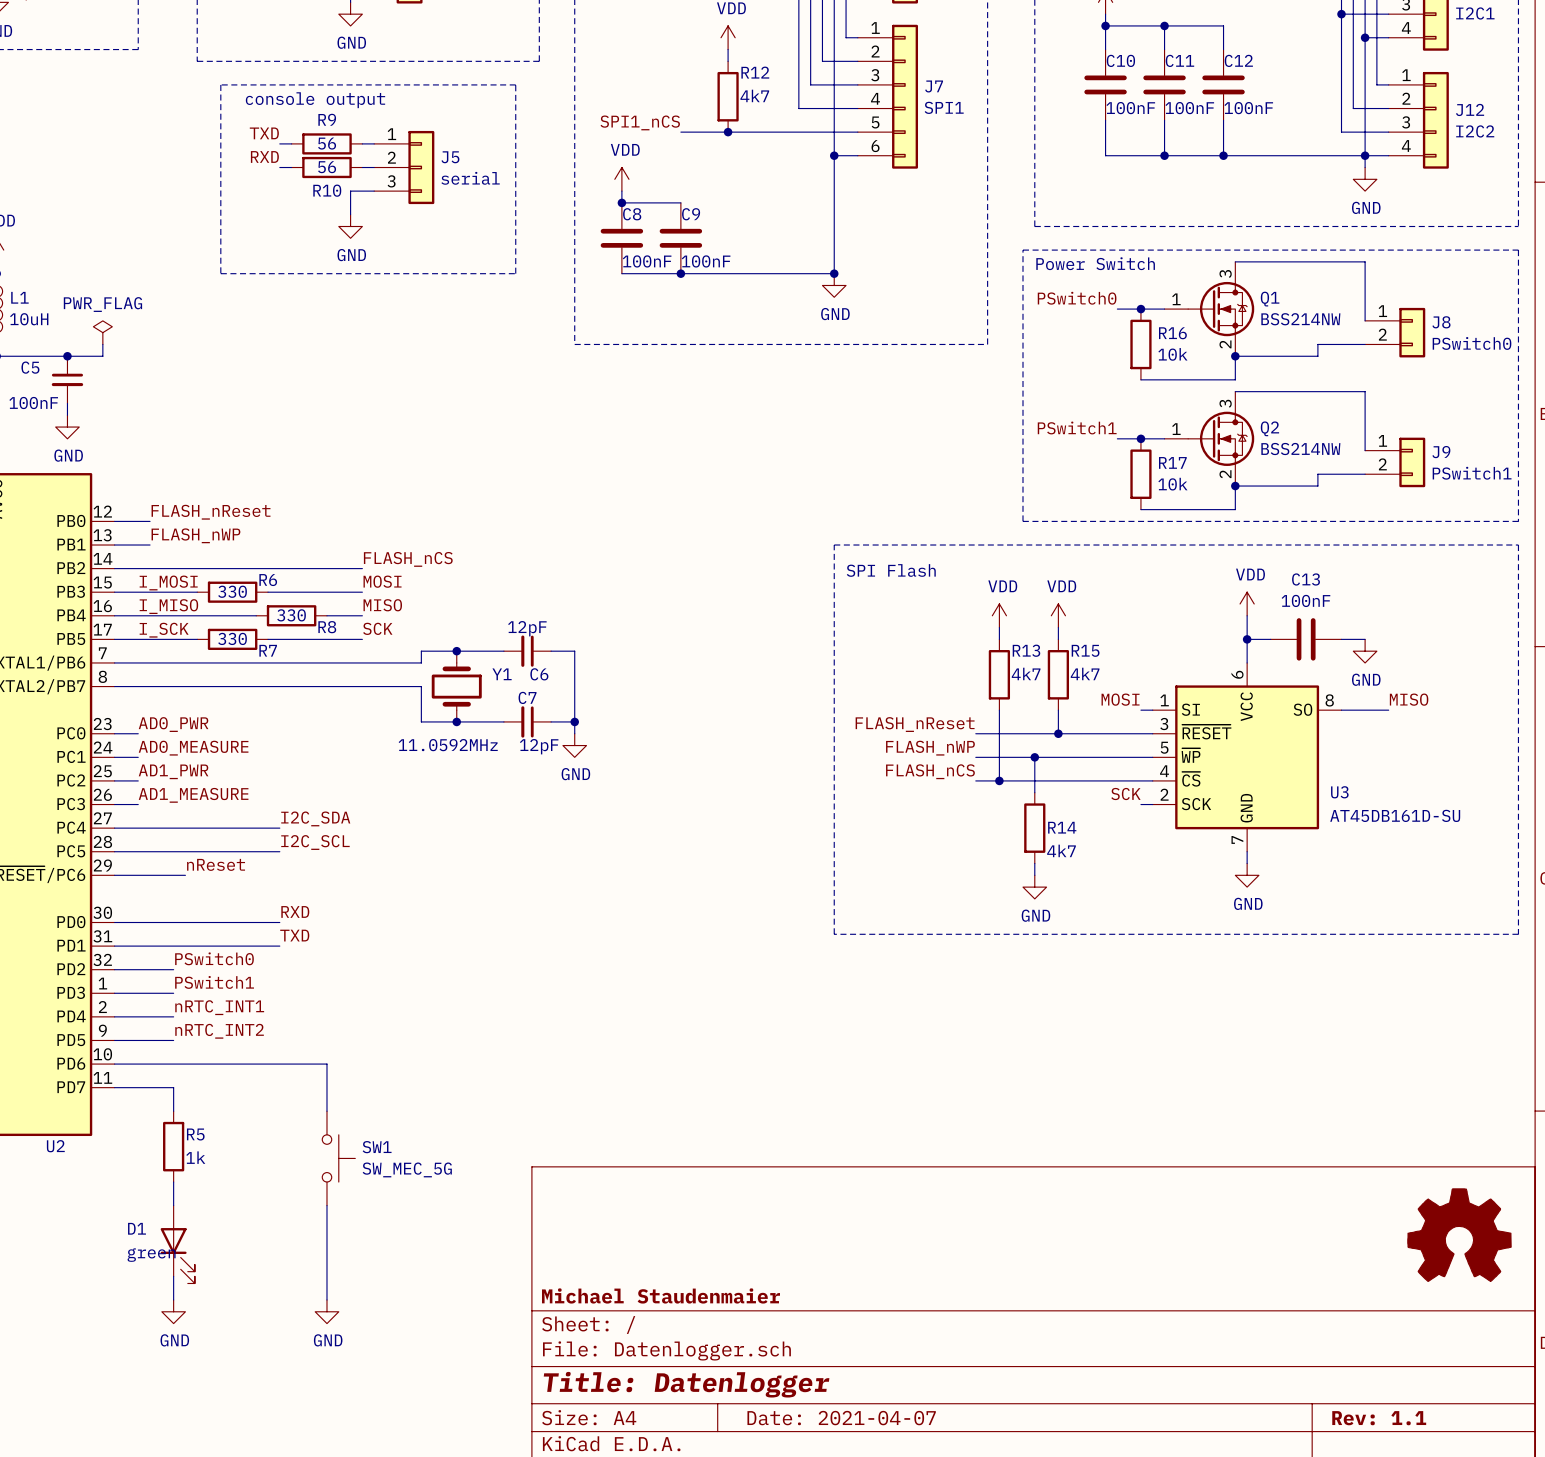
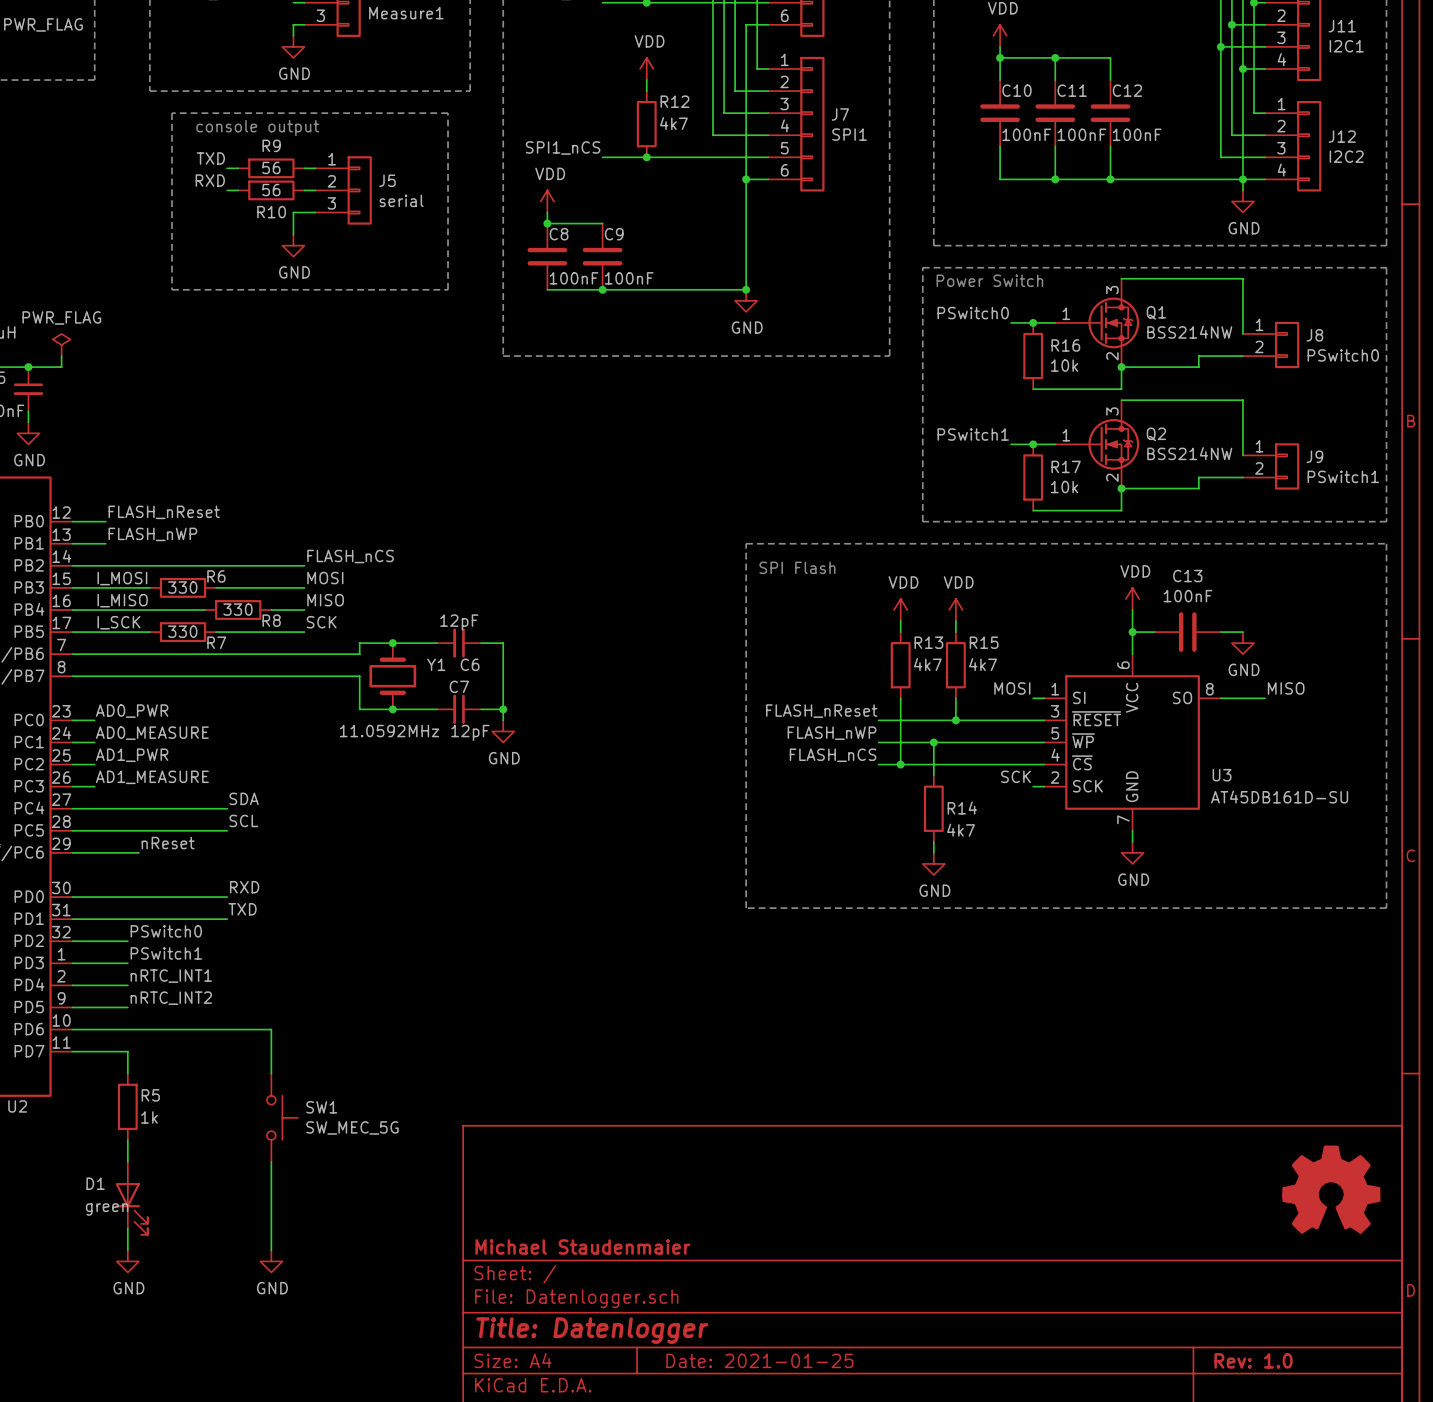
label: I2C_SDA (315, 818) -> SDA (244, 798)
label: I2C_SCL (315, 842) -> SCL (243, 820)
title block: Date: 2021-04-07 (841, 1418) -> Date: 2021-01-25 (759, 1360)
title block: Rev: 1.1 (1379, 1418) -> Rev: 1.0 (1253, 1360)

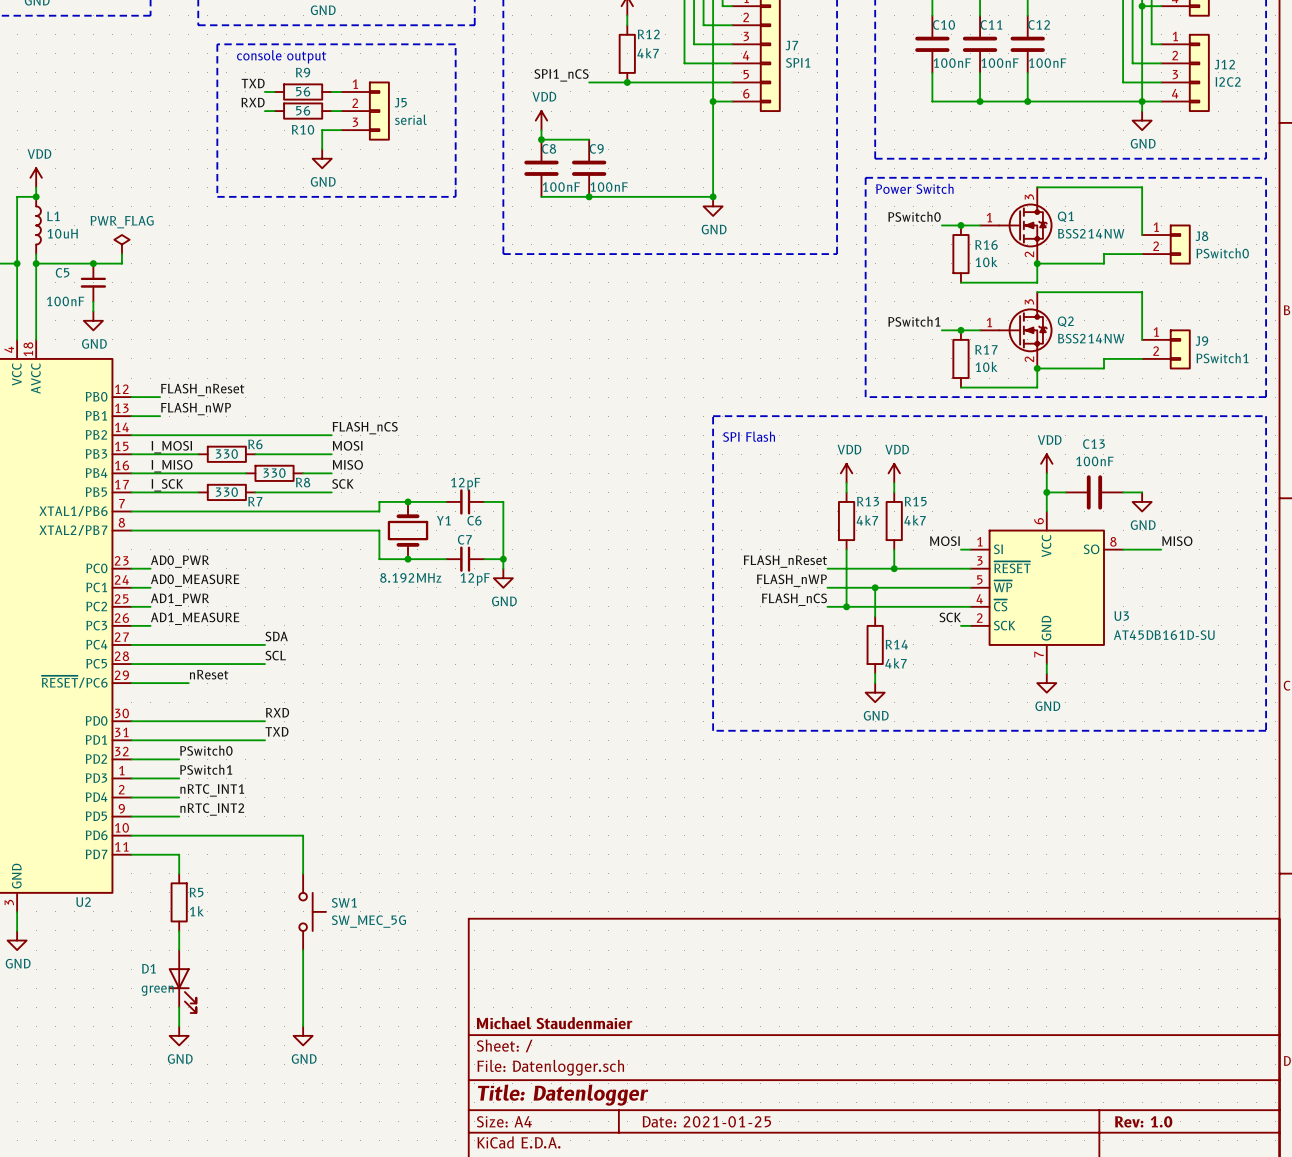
Y1 value: 11.0592MHz (389, 731) -> 8.192MHz (410, 577)
power symbol: (1331, 1189) -> none

